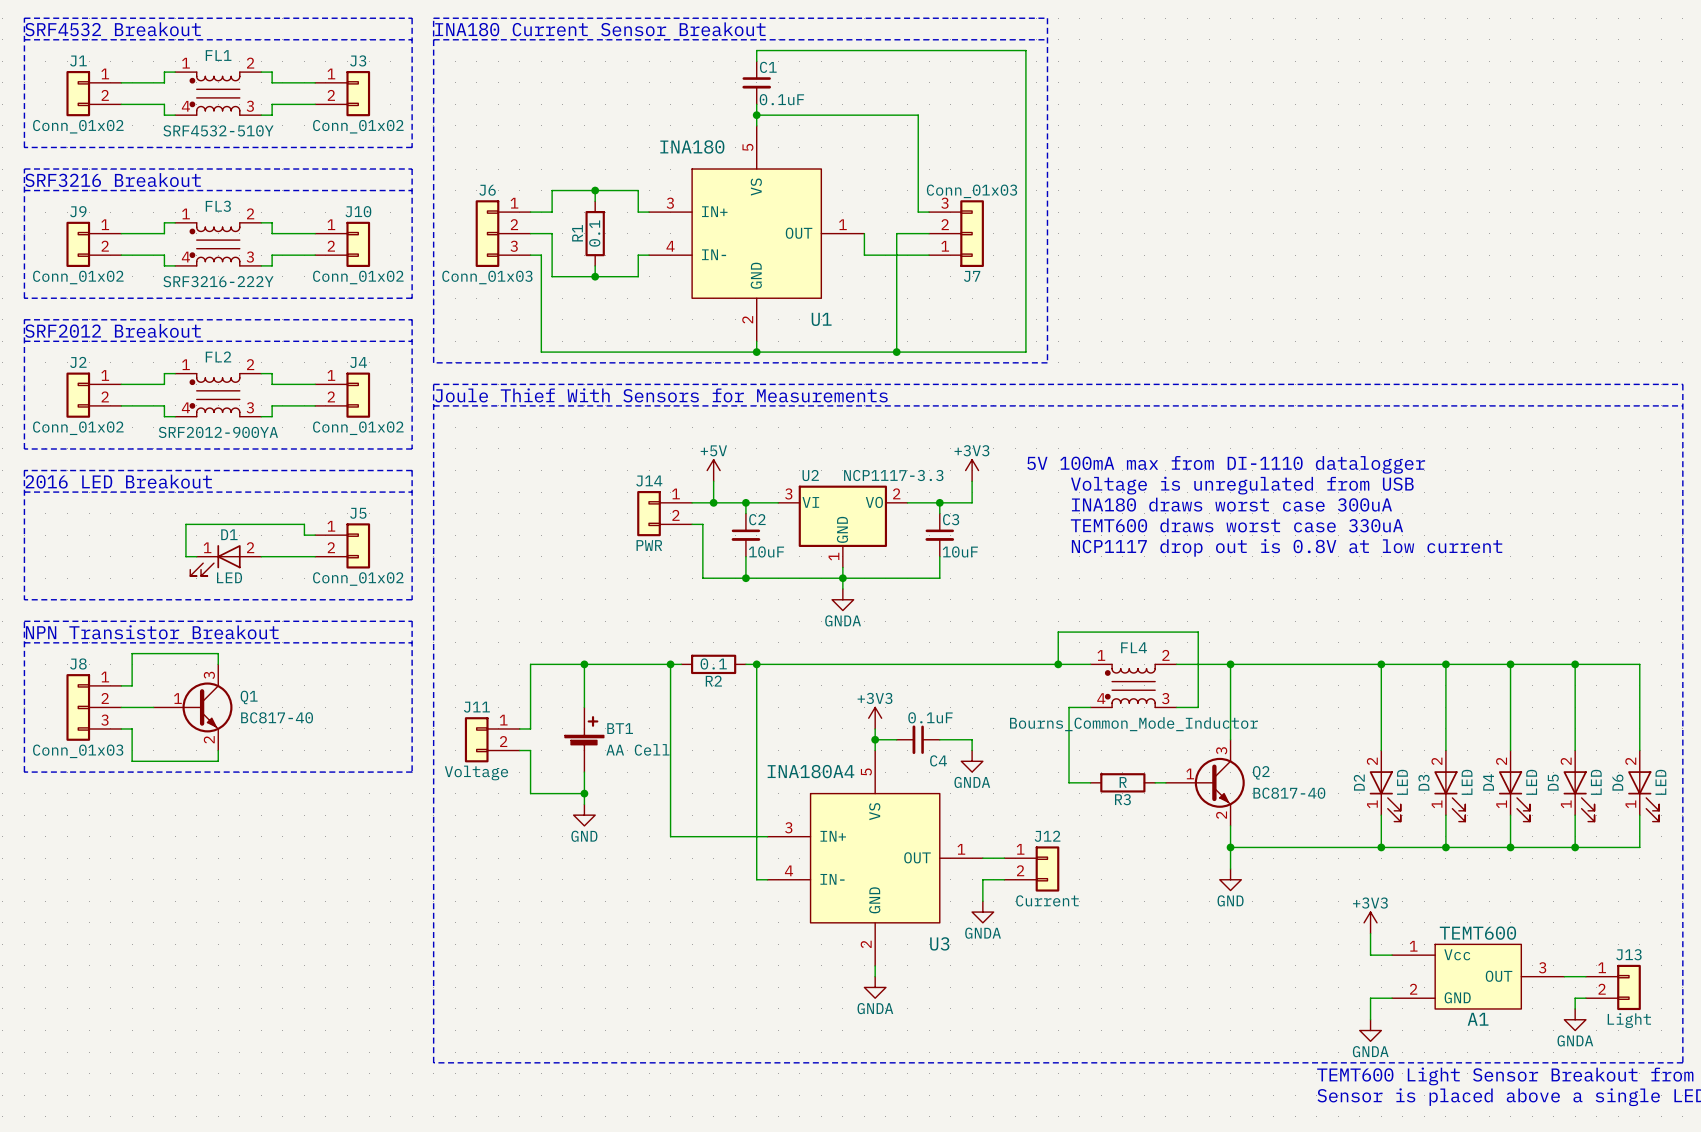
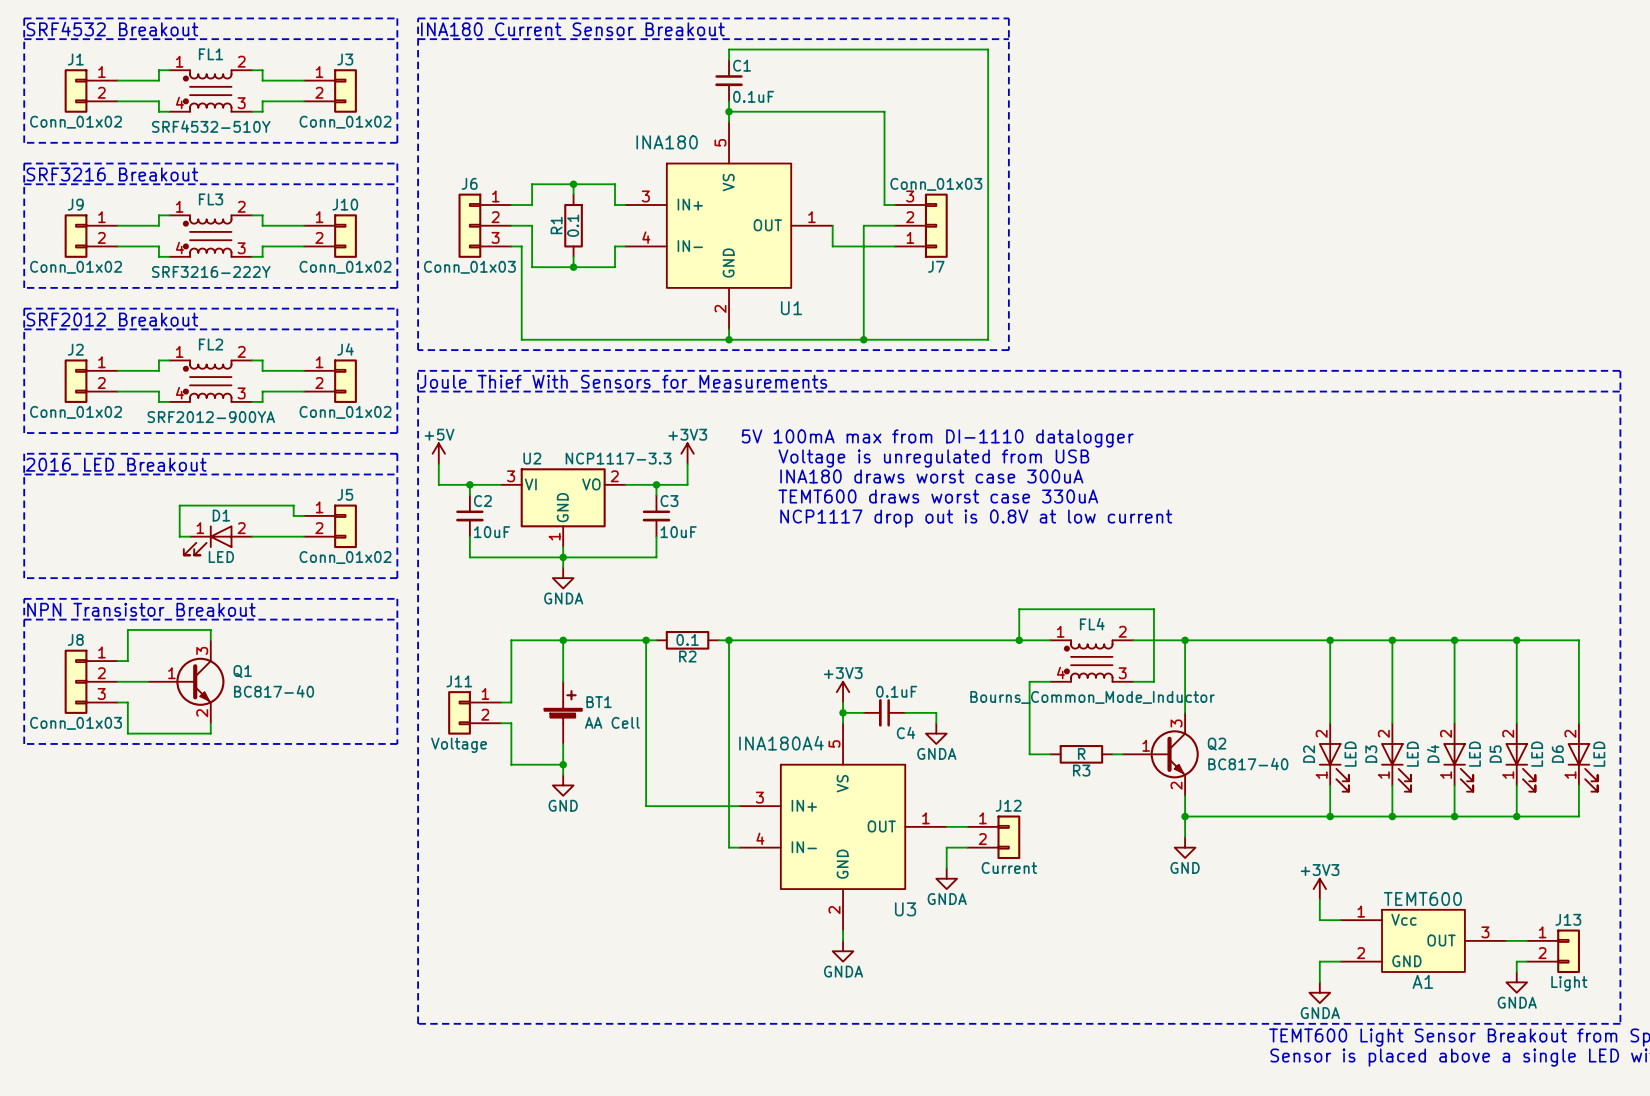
text: none -> 5V 100mA max from DI-1110 datalogger (937, 438)
text: 5V 100mA max from DI-1110 datalogger (1226, 464) -> none
power symbol: none -> +5V (438, 453)
power symbol: +5V (713, 470) -> +3V3 (687, 453)
power symbol: +3V3 (972, 470) -> none
text: none -> Voltage is unregulated from USB (933, 458)
wire: none -> (438, 464) (438, 484) (500, 484)
wire: (972, 481) (972, 502) (907, 502) -> none
text: Voltage is unregulated from USB (1242, 485) -> none
text: none -> INA180 draws worst case 300uA (931, 476)
wire: none -> (469, 484) (469, 495)
junction: none -> (469, 484)
junction: none -> (656, 484)
wire: (713, 502) (778, 502) -> none
junction: (713, 502) -> none
wire: (745, 502) (745, 513) -> (656, 484) (656, 495)
junction: (745, 502) -> none
wire: (939, 502) (939, 513) -> none
junction: (939, 502) -> none
text: INA180 draws worst case 300uA (1231, 504) -> none
J14: PWR (664, 513) -> none
text: none -> TEMT600 draws worst case 330uA (938, 496)
wire: (692, 524) (702, 524) (702, 578) (939, 578) (939, 556) -> none
text: TEMT600 draws worst case 330uA (1236, 525) -> none
U2 position: (842, 526) -> (563, 507)
C2 position: (745, 535) -> (469, 515)
C3 position: (939, 535) -> (656, 515)
text: none -> NCP1117 drop out is 0.8V at low current (976, 518)
text: NCP1117 drop out is 0.8V at low current (1287, 547) -> none
wire: none -> (469, 536) (469, 557) (656, 557) (656, 536)
wire: (745, 556) (745, 578) -> (563, 547) (563, 567)
wire: (842, 567) (842, 588) -> none
junction: none -> (563, 557)
junction: (745, 578) -> none
junction: (842, 578) -> none
power symbol: none -> GNDA (563, 578)
power symbol: GNDA (842, 599) -> none

